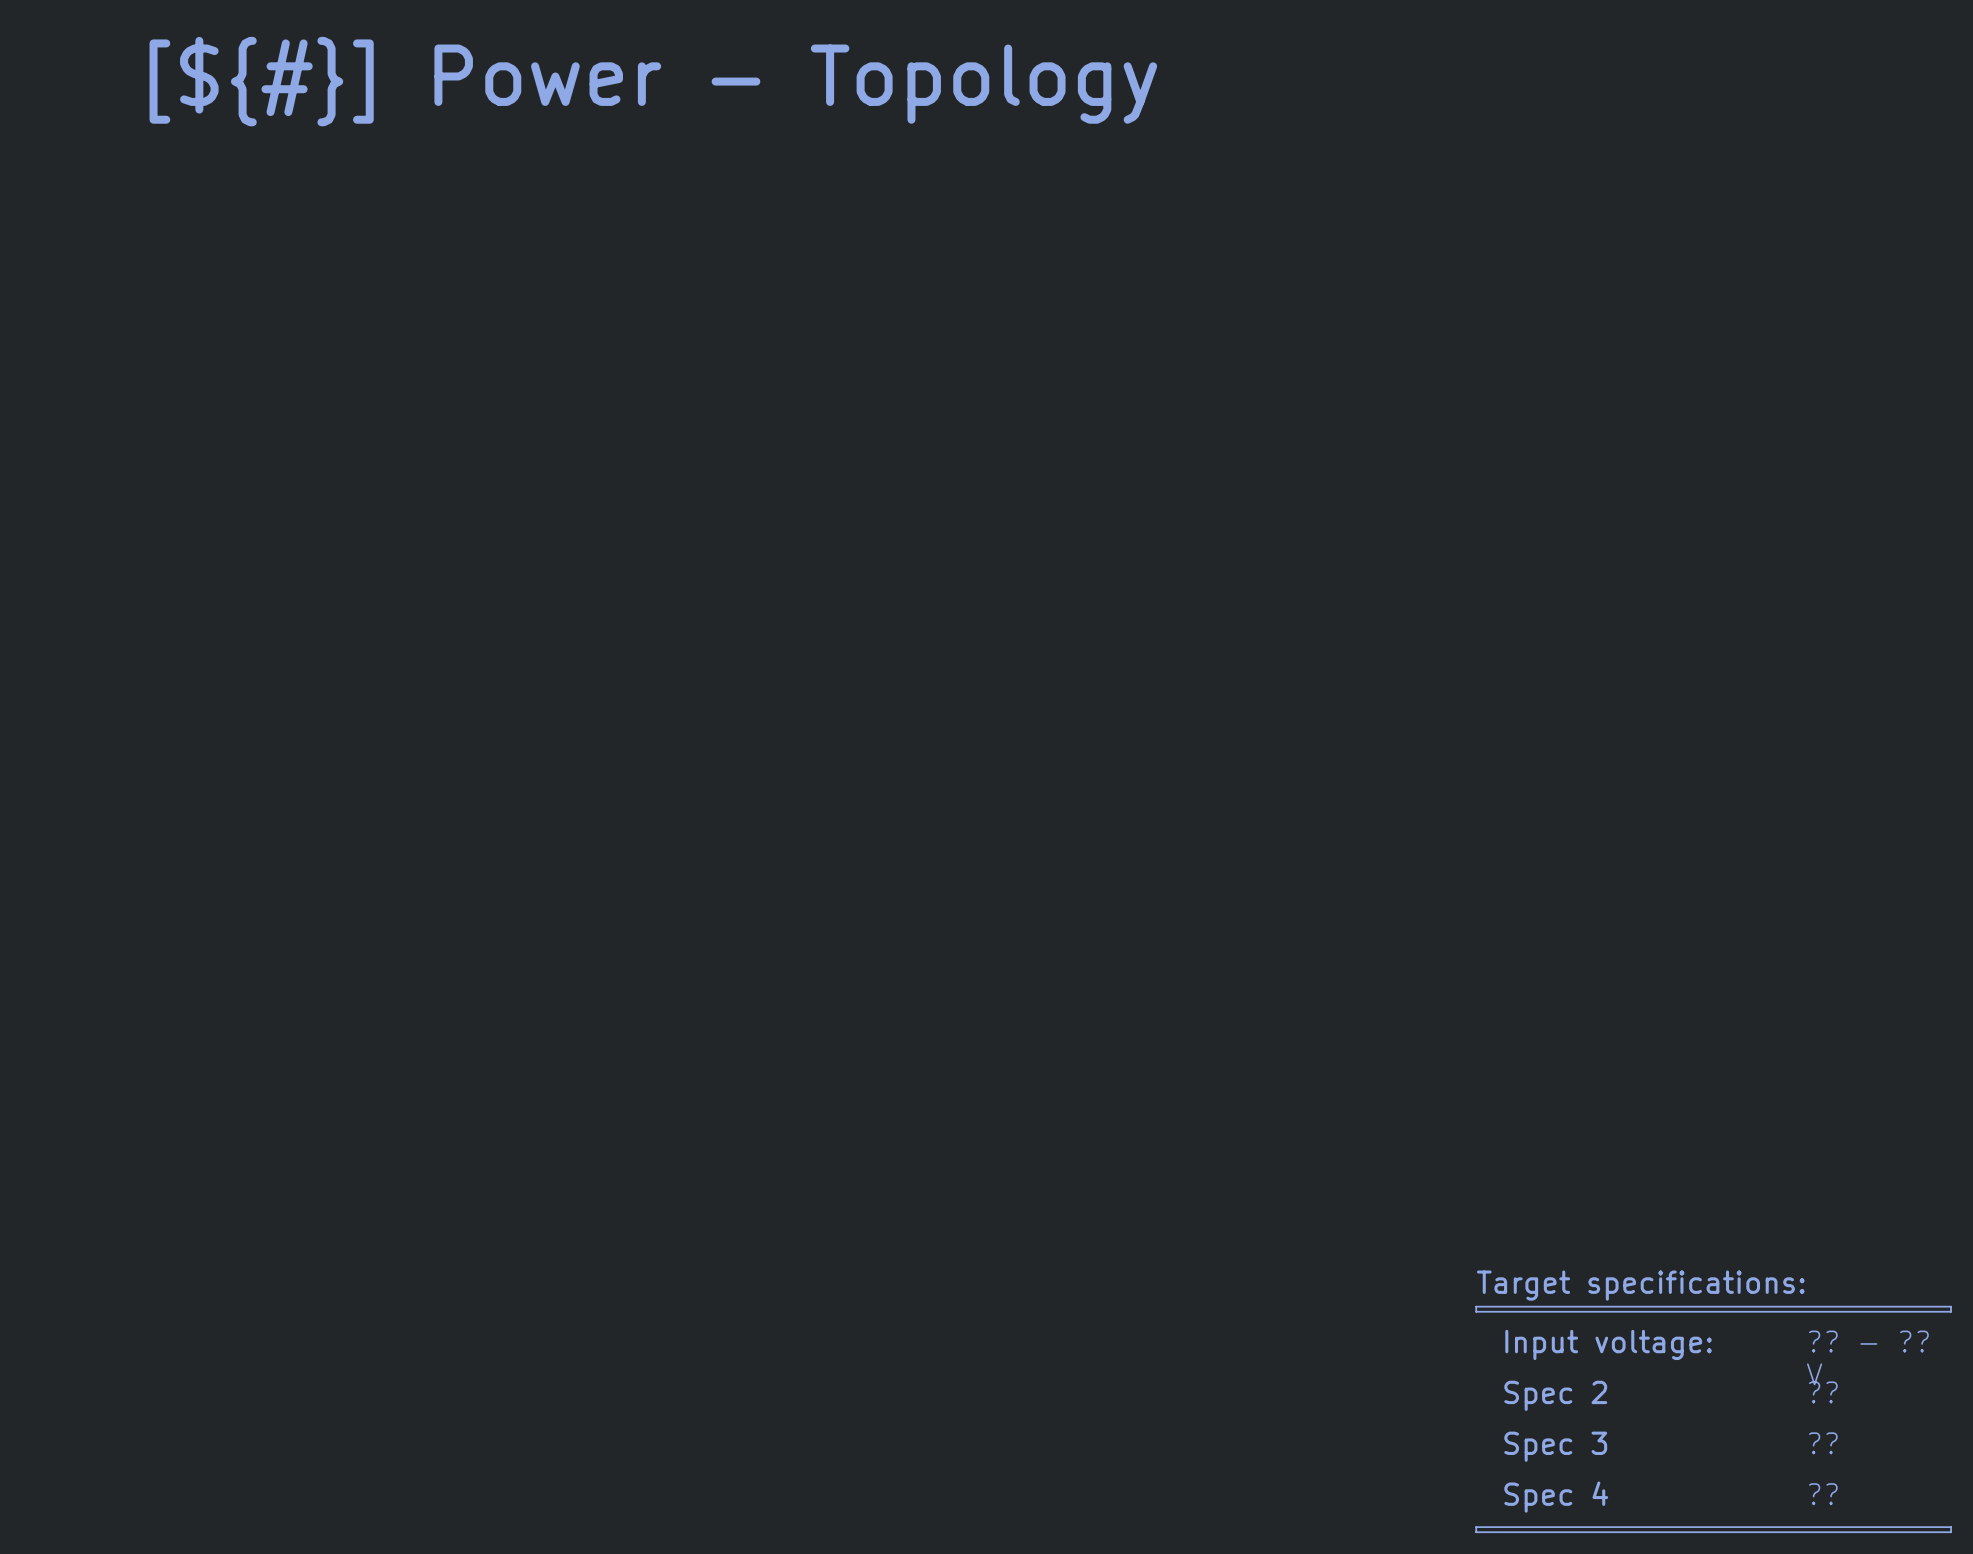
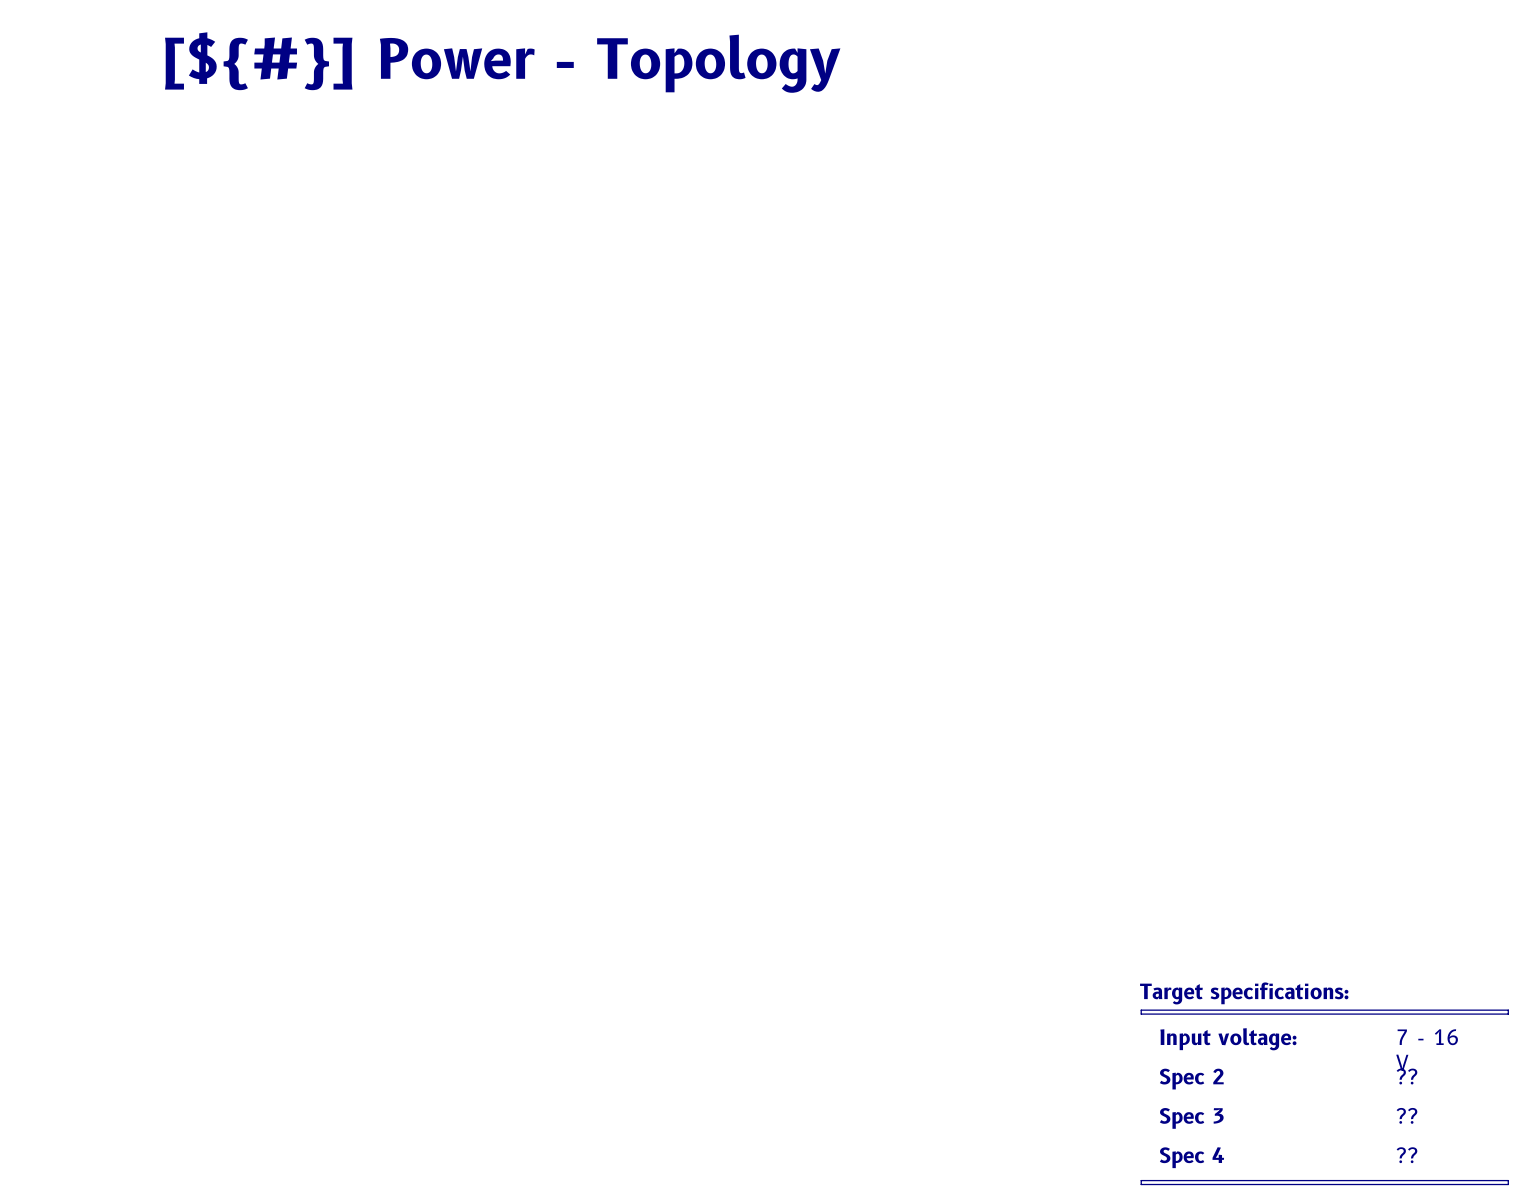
text: ?? - ?? (1868, 1341) -> 7 - 16 (1427, 1037)

